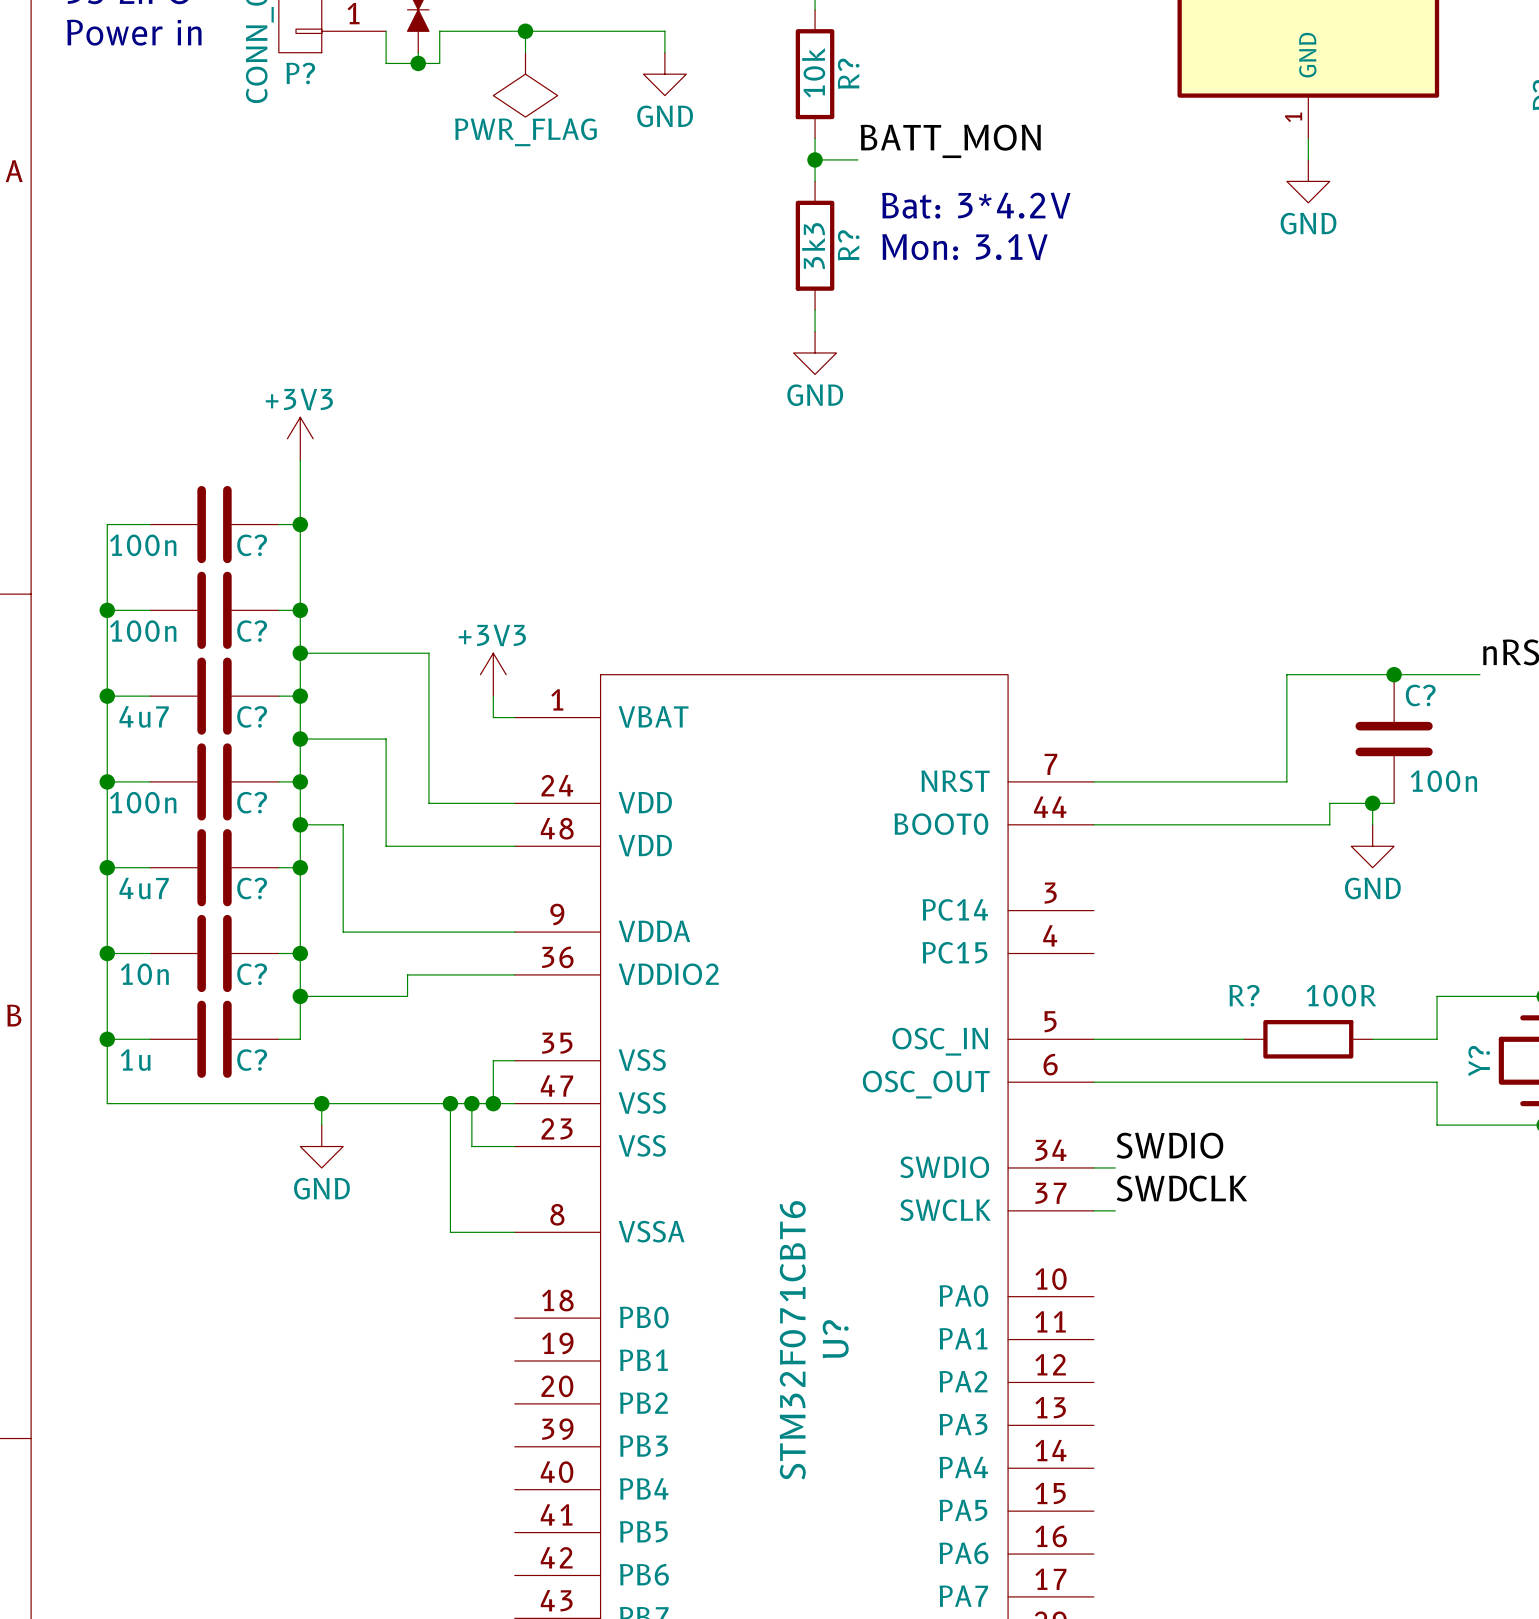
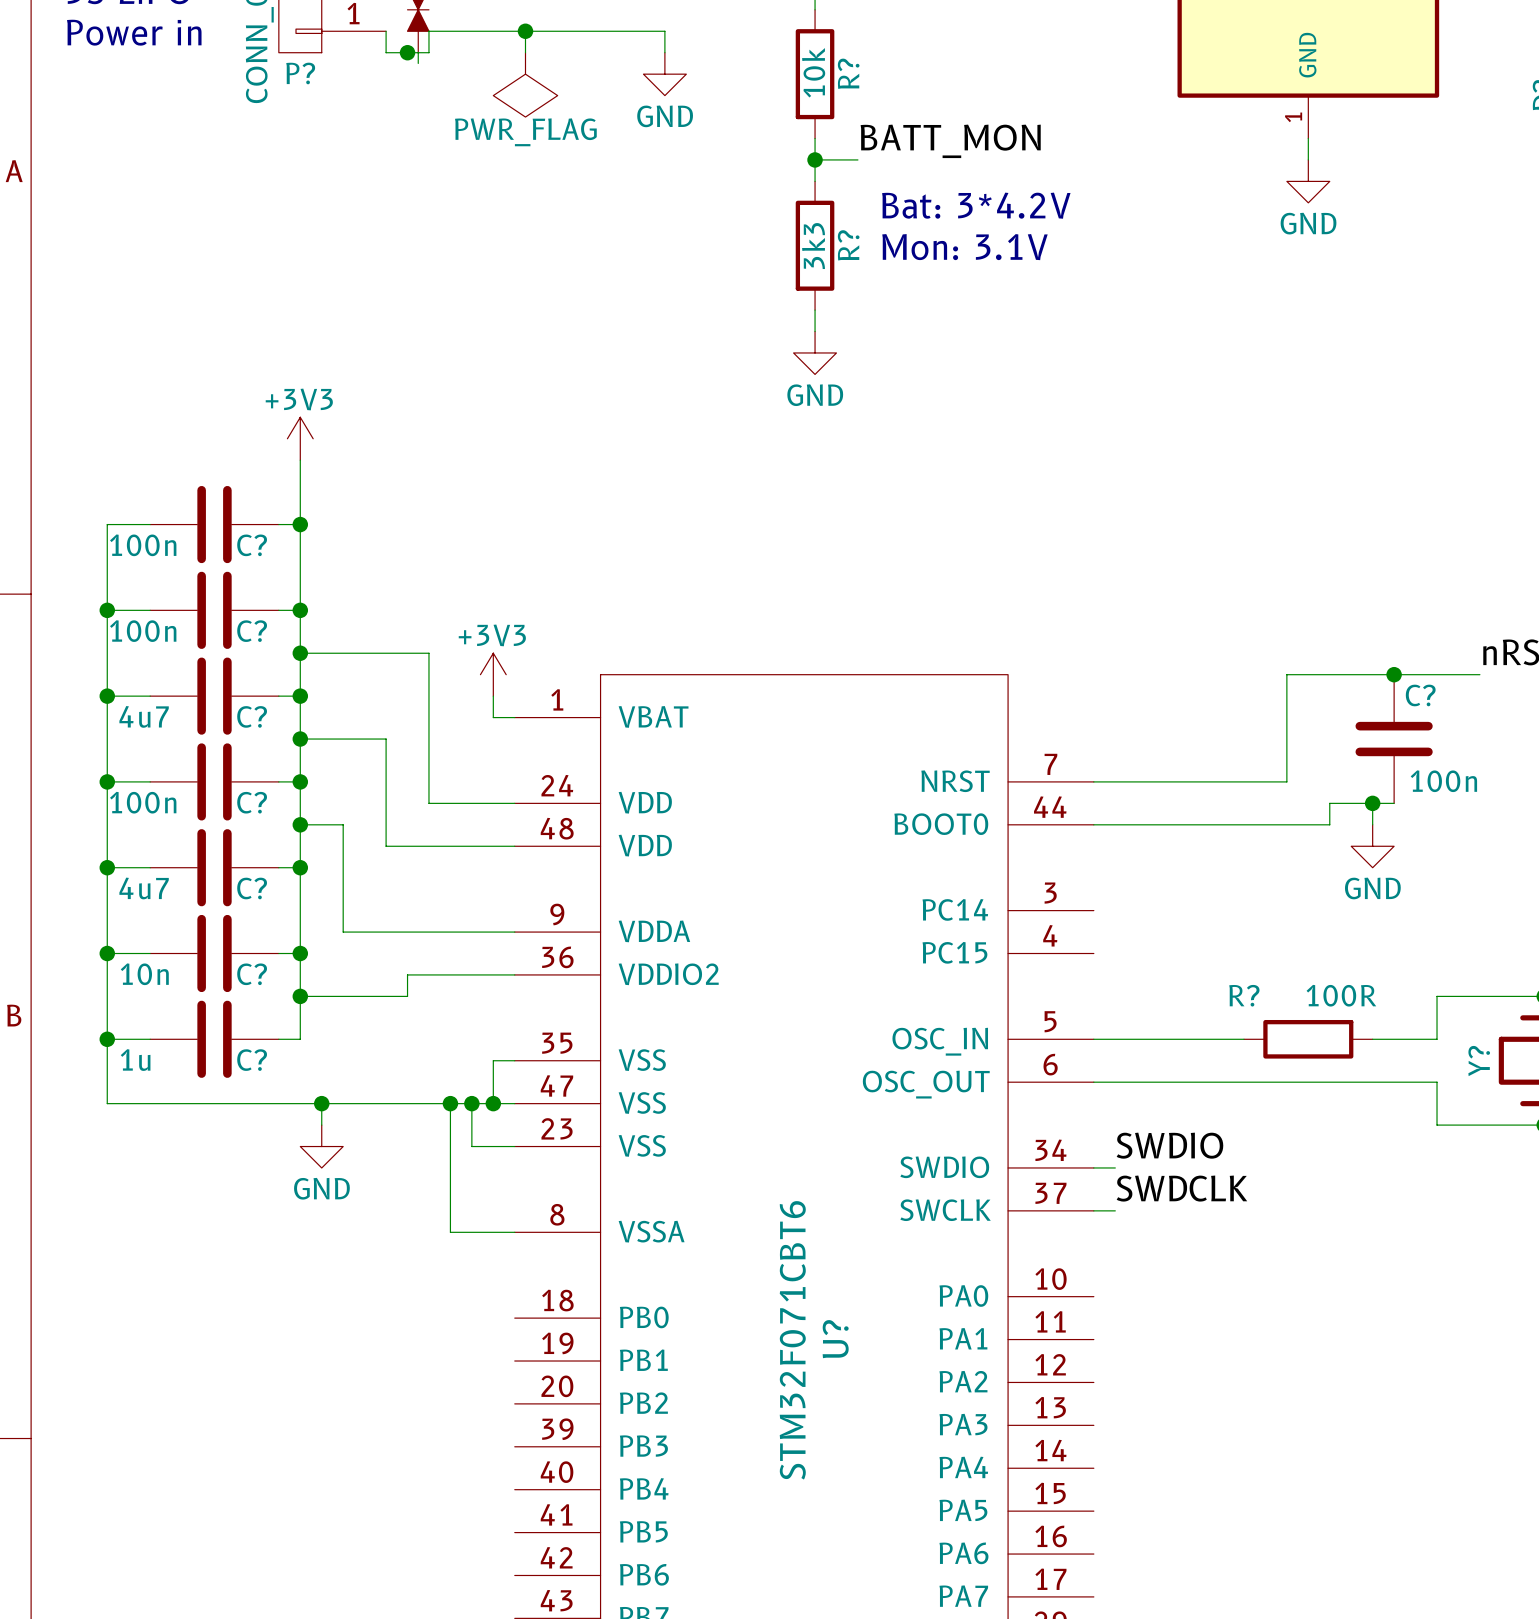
wire: (439, 31) (439, 63) (386, 63) (386, 52) -> (439, 31) (428, 31) (428, 52) (386, 52)
junction position: (418, 63) -> (407, 52)

